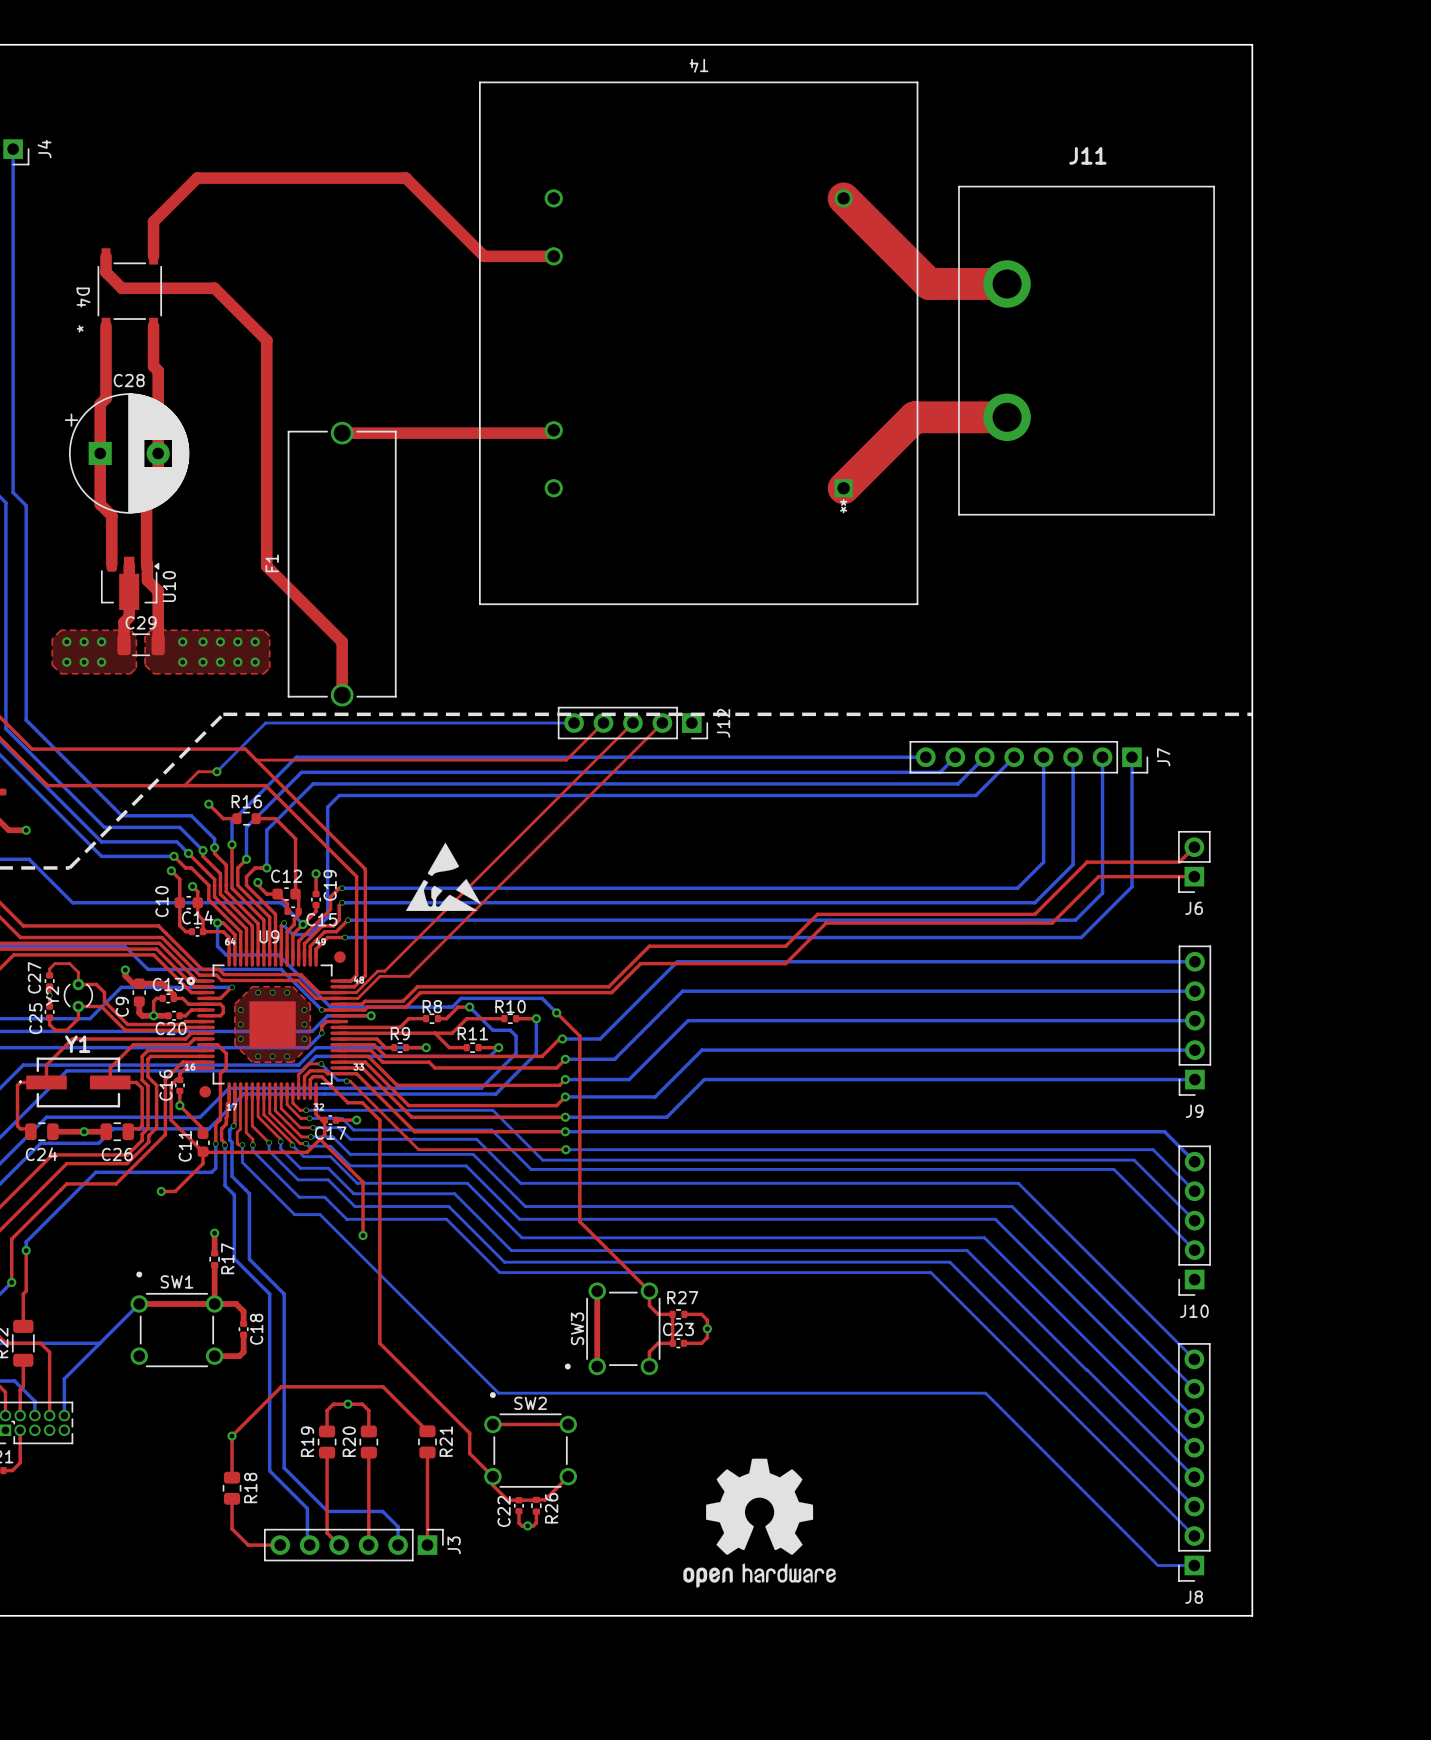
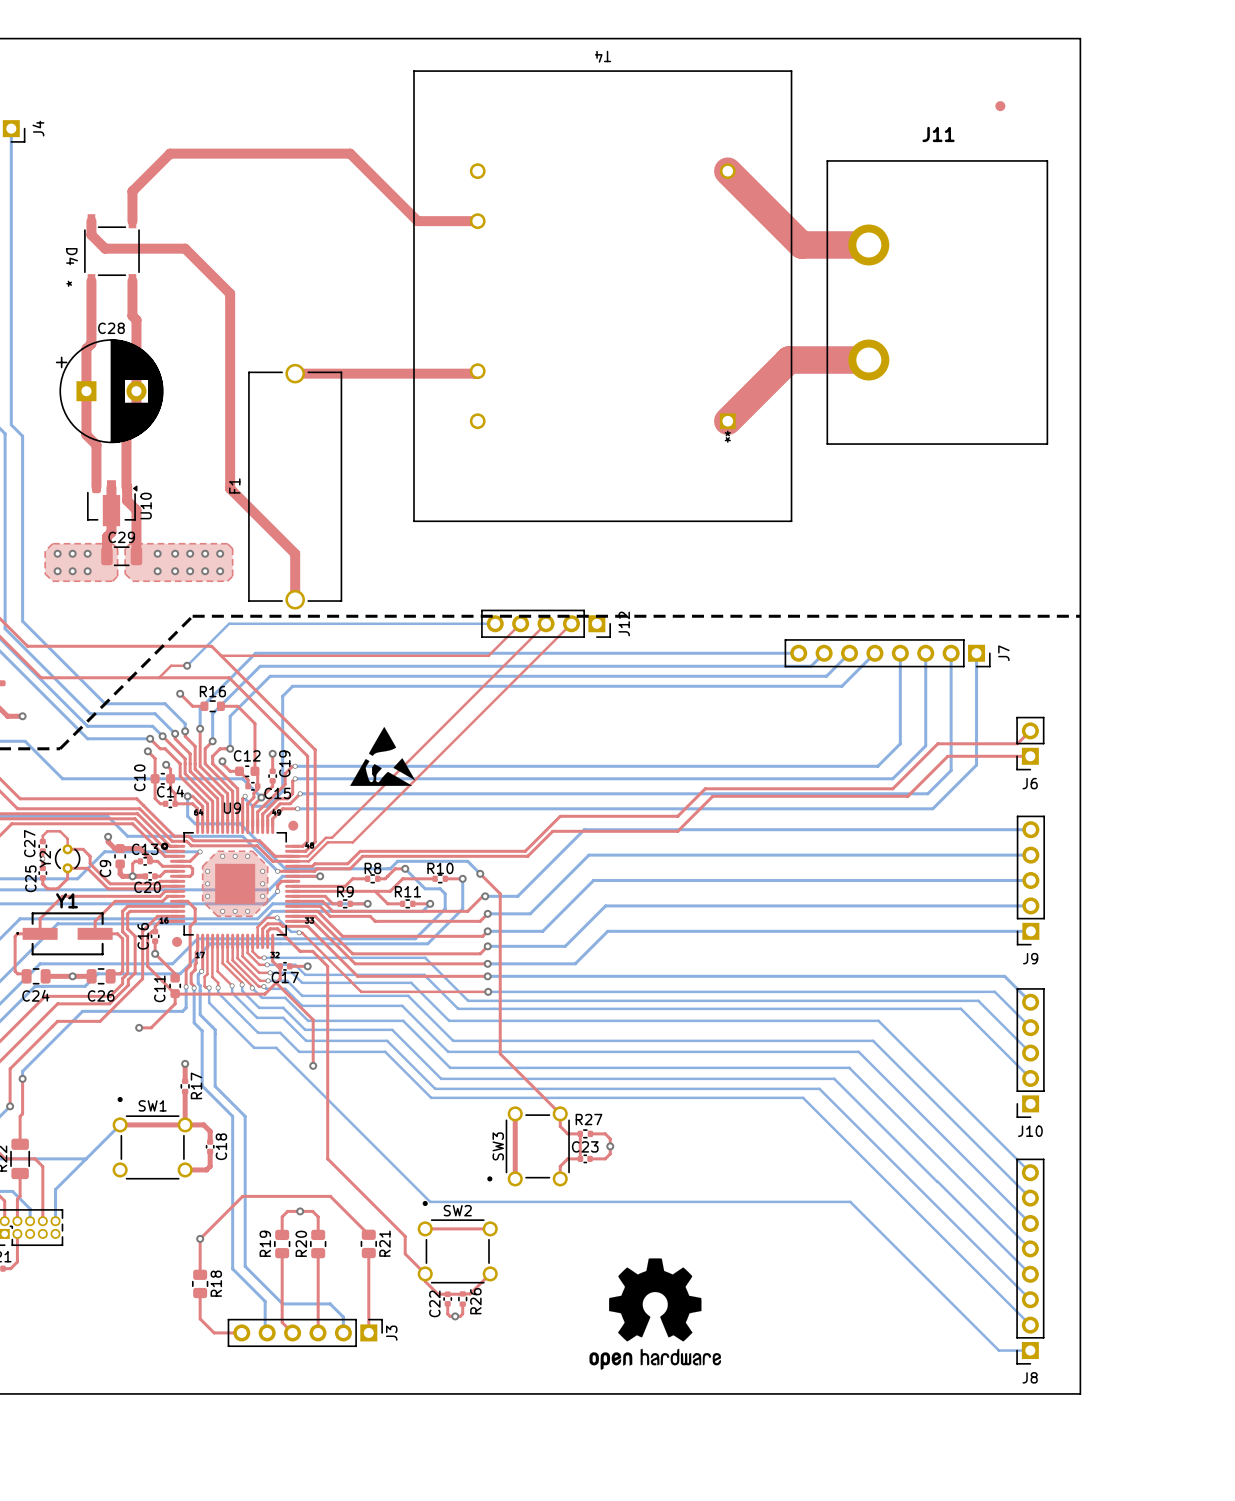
part: none -> (1000, 106)

